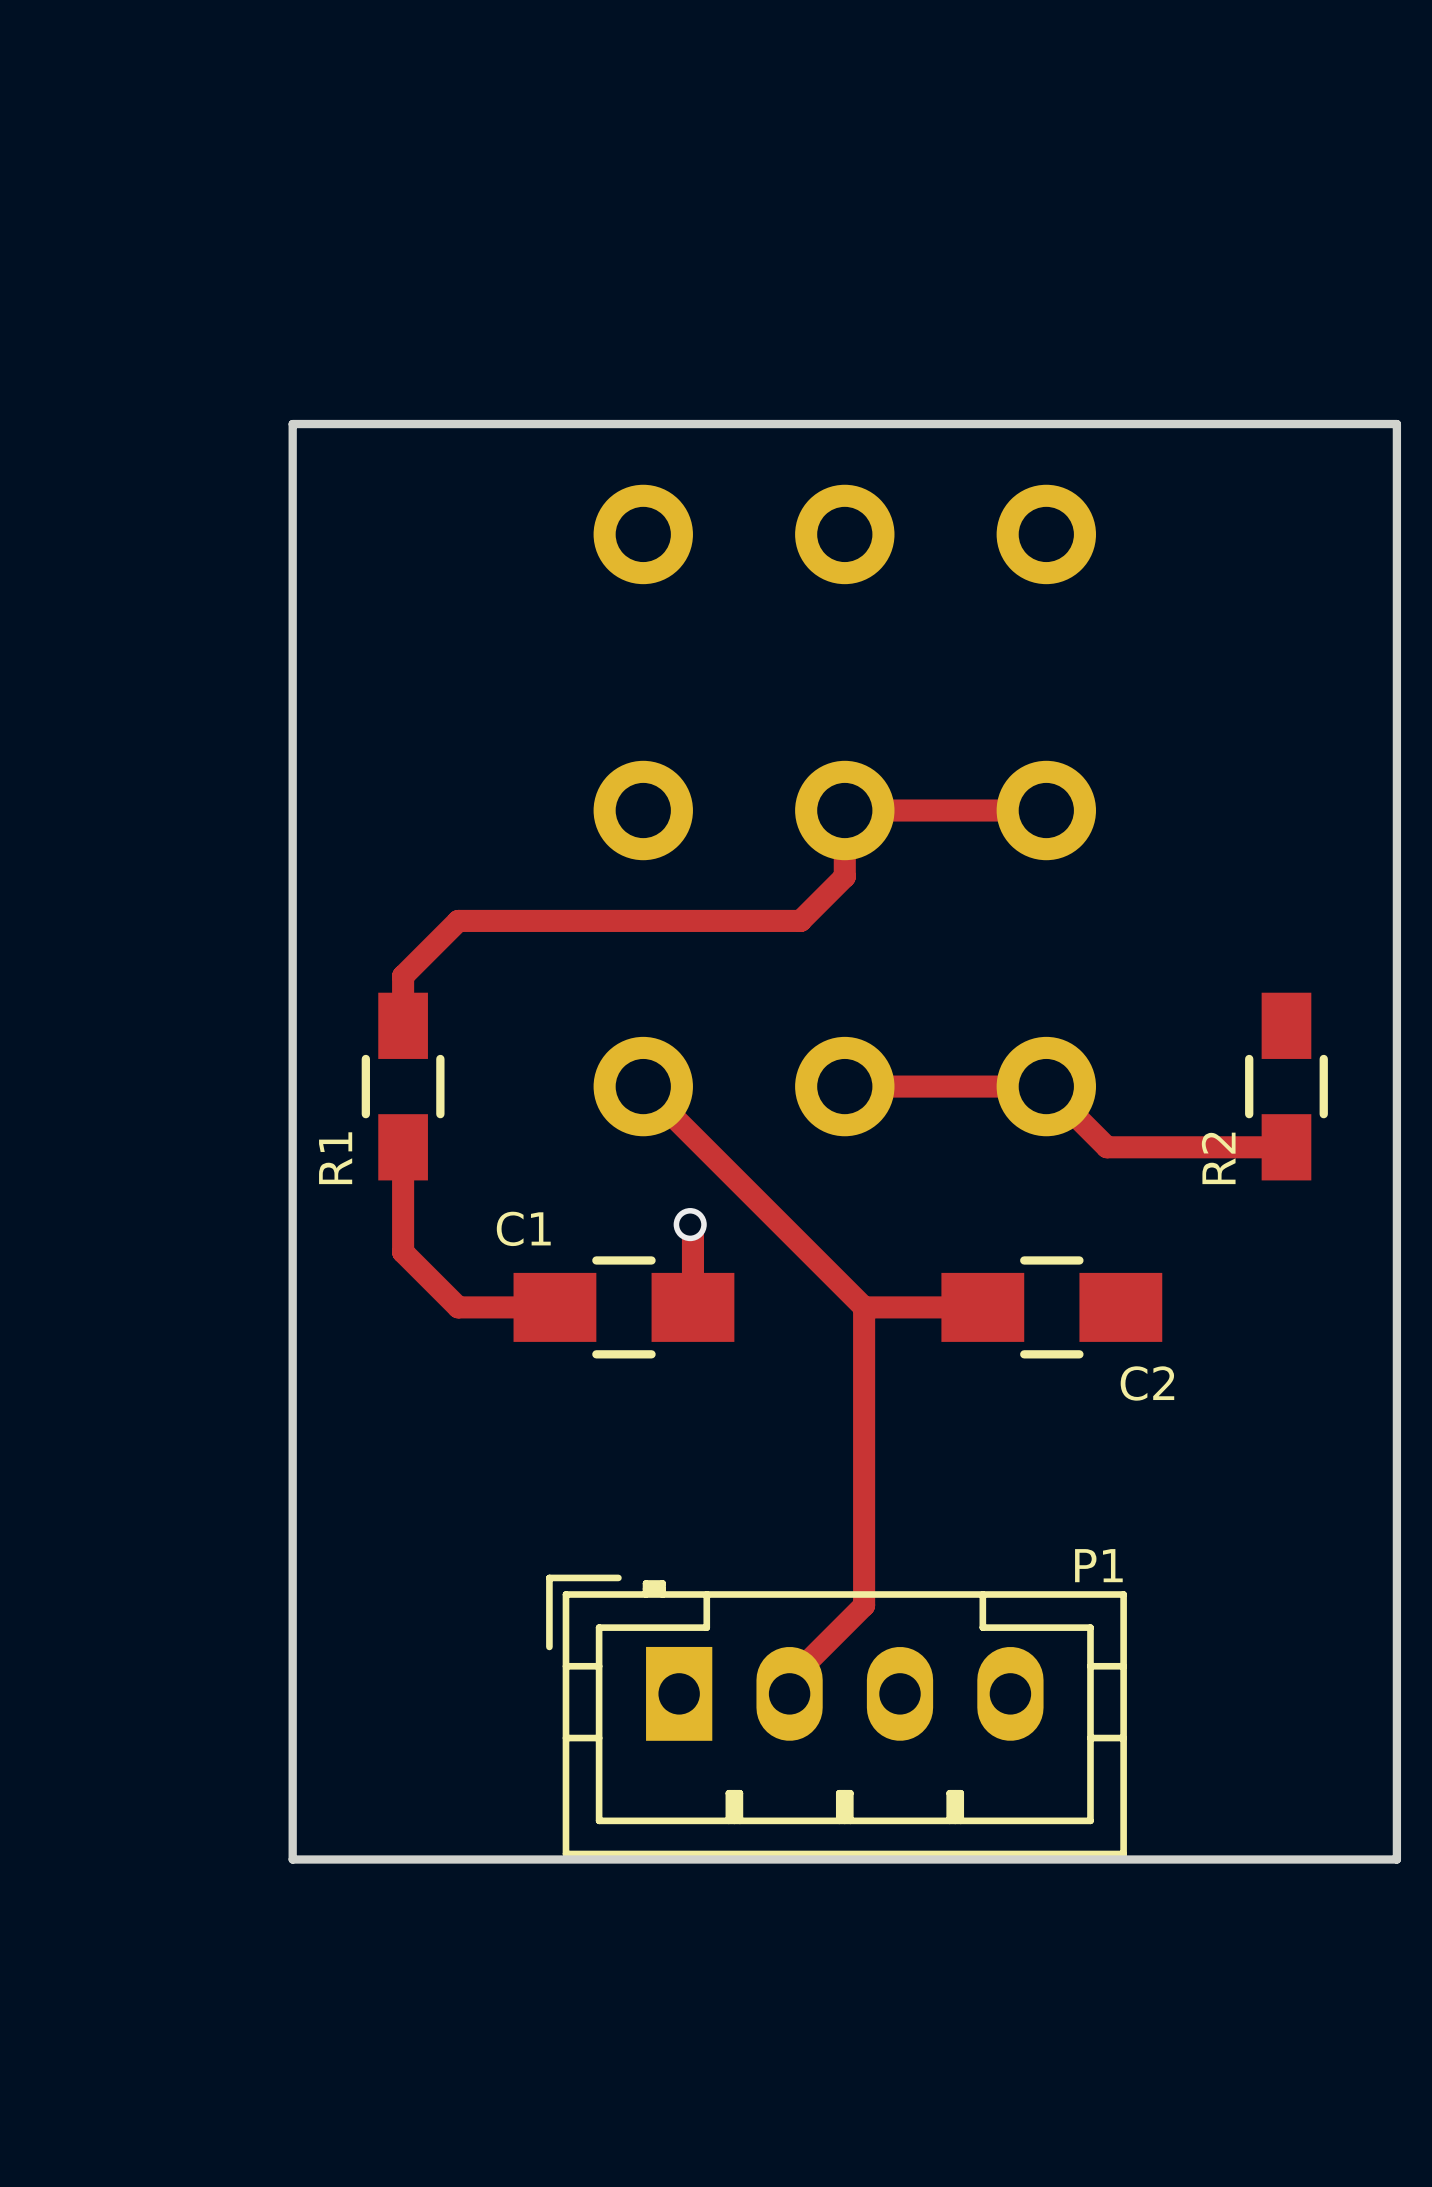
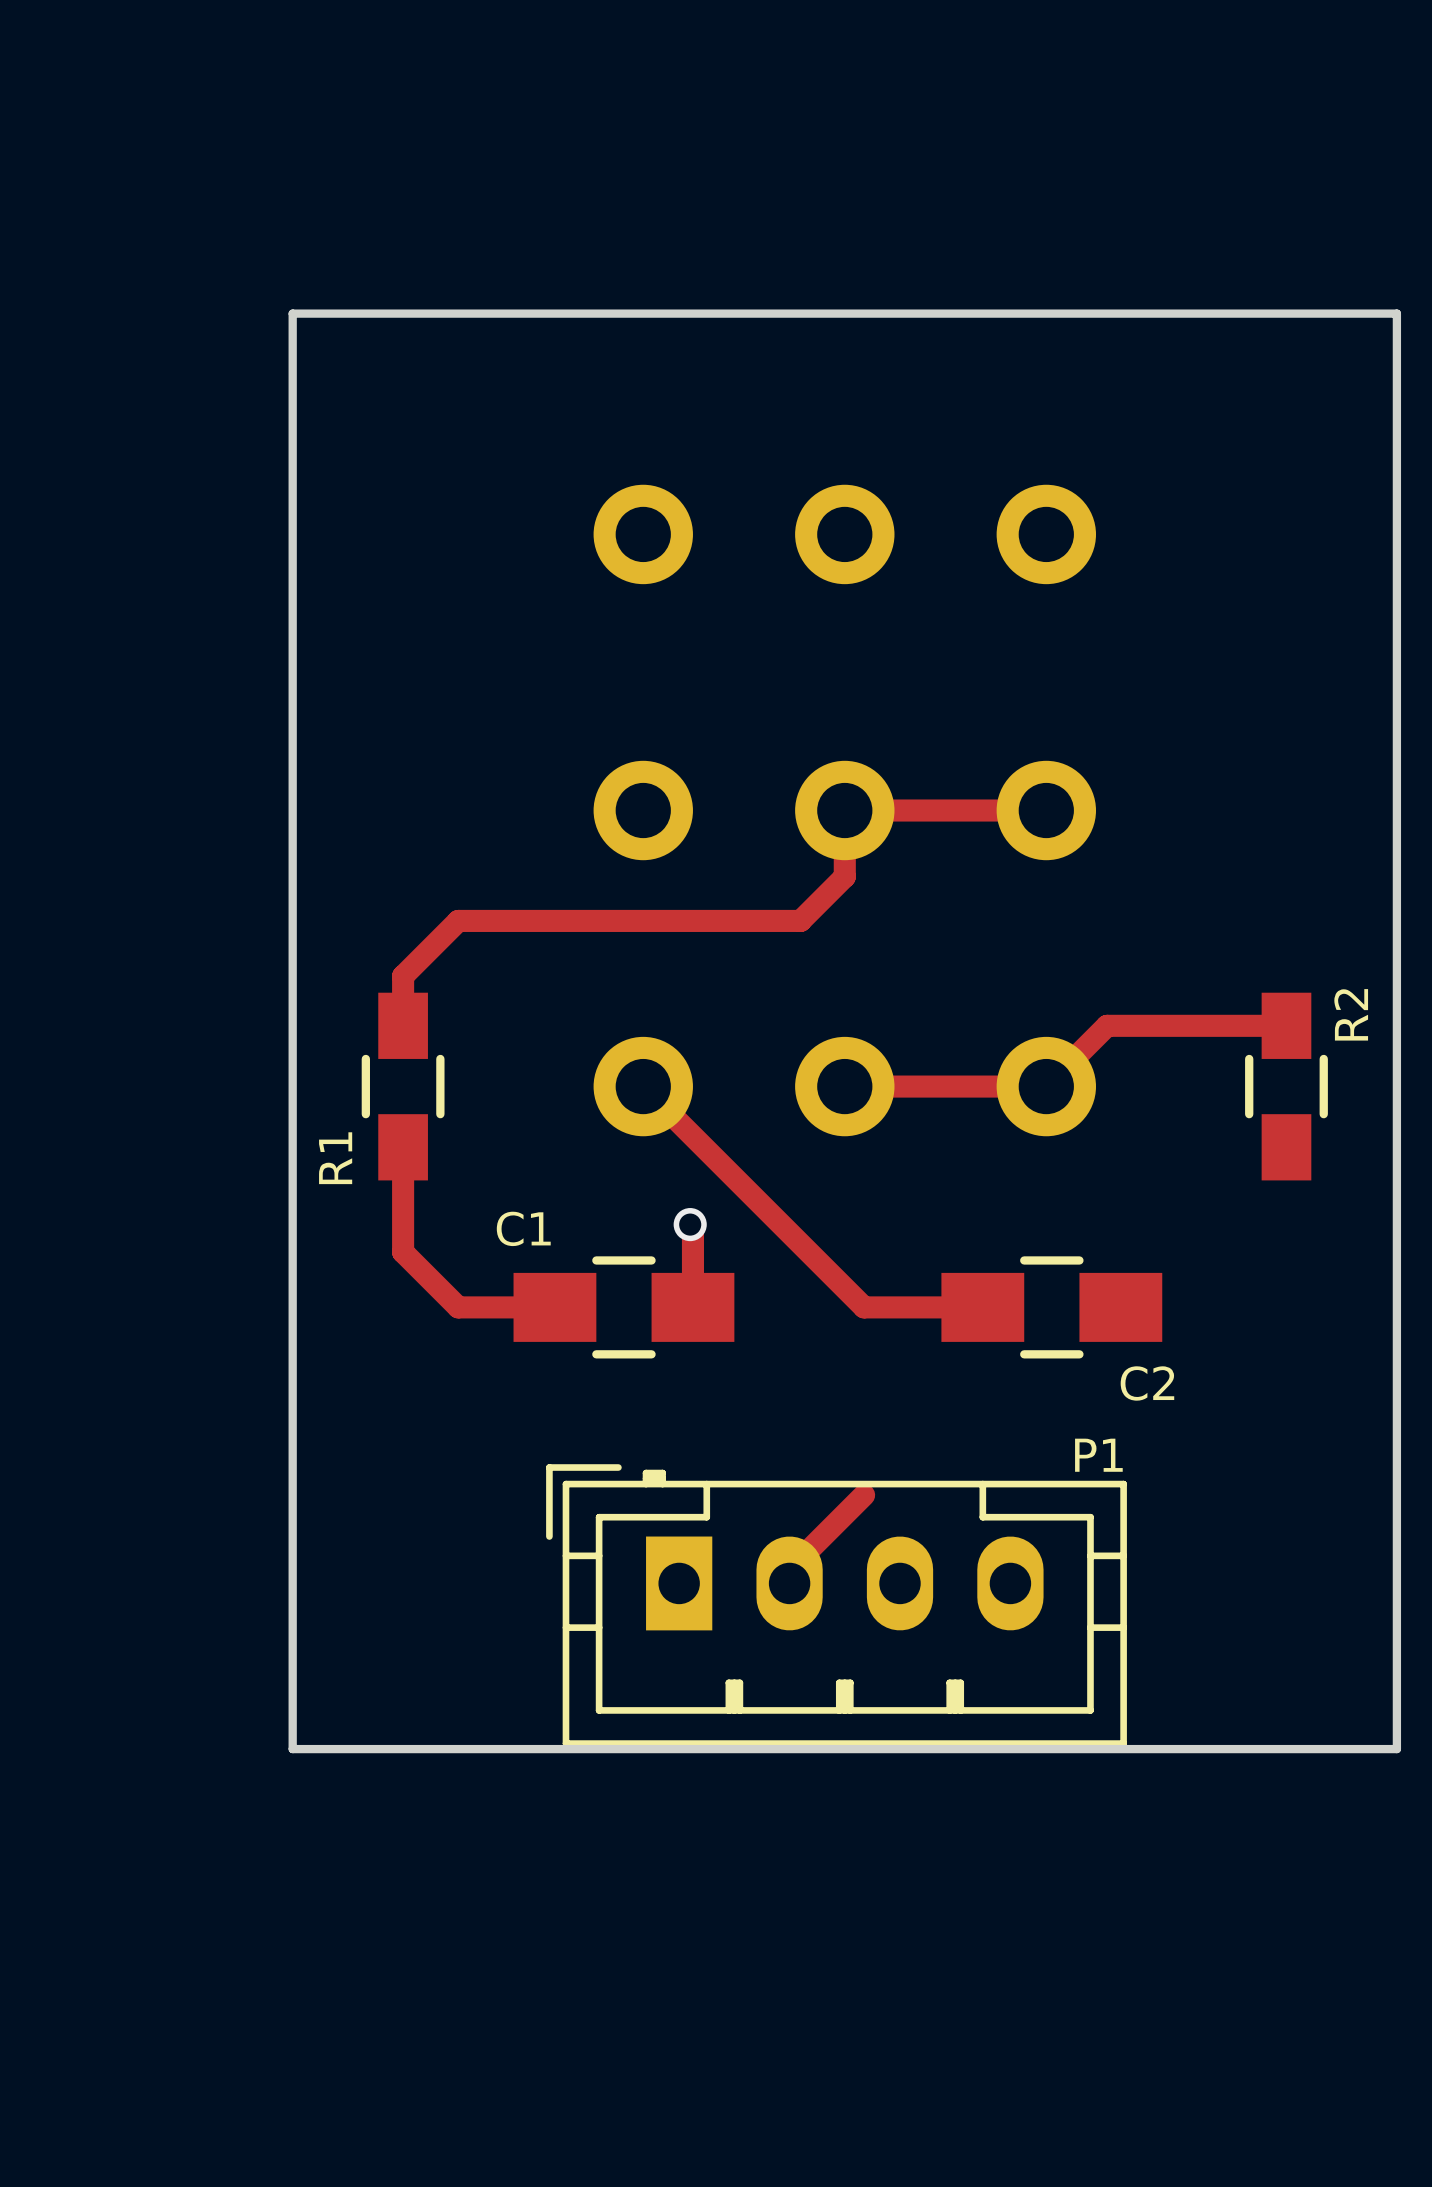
board edge: (292, 424) (1396, 424) -> (292, 424) (292, 313) (1396, 313) (1396, 424)
track: (1046, 1086) (1107, 1147) (1286, 1147) -> (1046, 1086) (1107, 1025) (1286, 1025)
R2 name position: R2 (1218, 1158) -> R2 (1351, 1014)
track: (864, 1307) (864, 1605) (789, 1680) (789, 1693) -> none
track: none -> (864, 1495) (789, 1569) (789, 1583)
P1 position: (836, 1715) -> (836, 1605)
board edge: (292, 1749) (292, 1859) (1396, 1859) (1396, 1749) -> (292, 1749) (1396, 1749)

